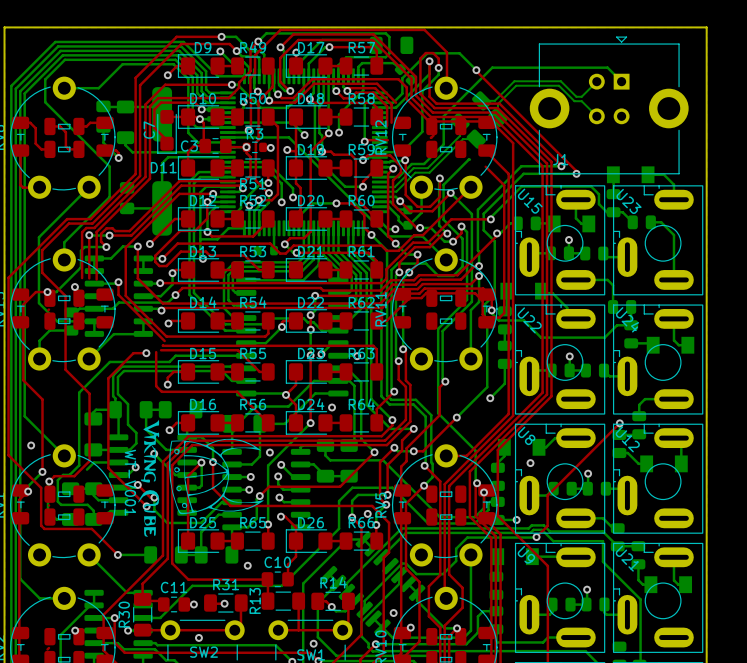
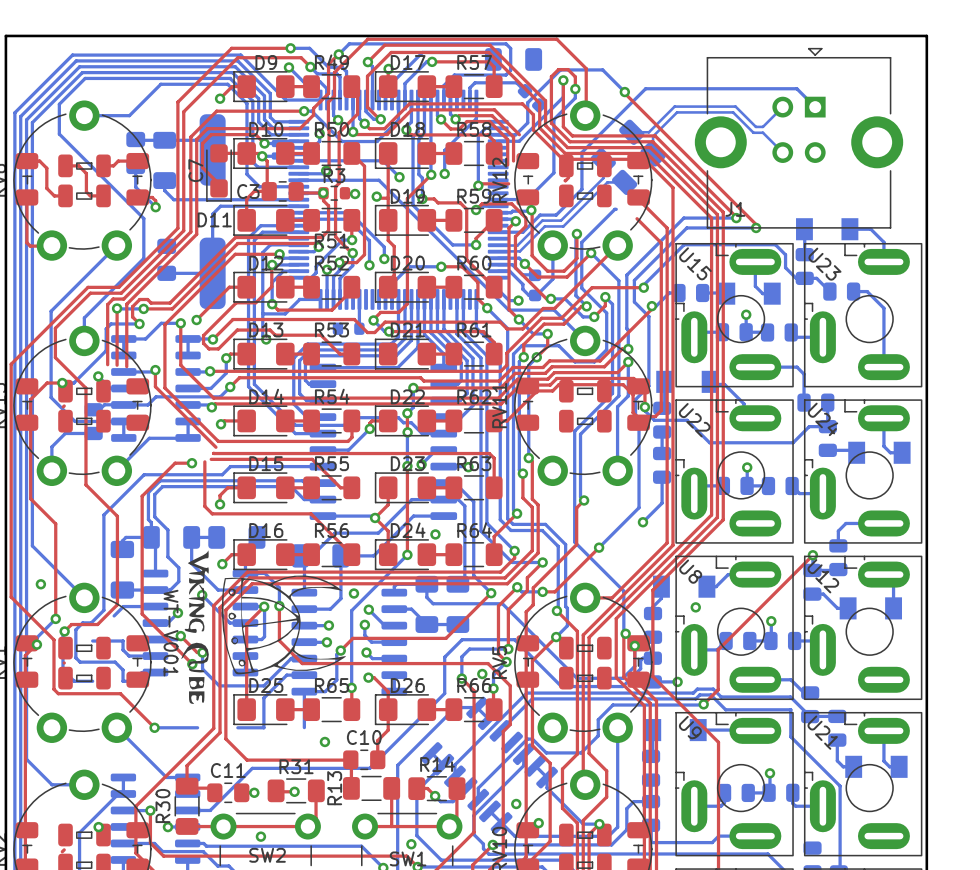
part: (70, 504) -> none
part: (93, 504) -> none
part: (166, 554) -> none
part: (216, 554) -> none

